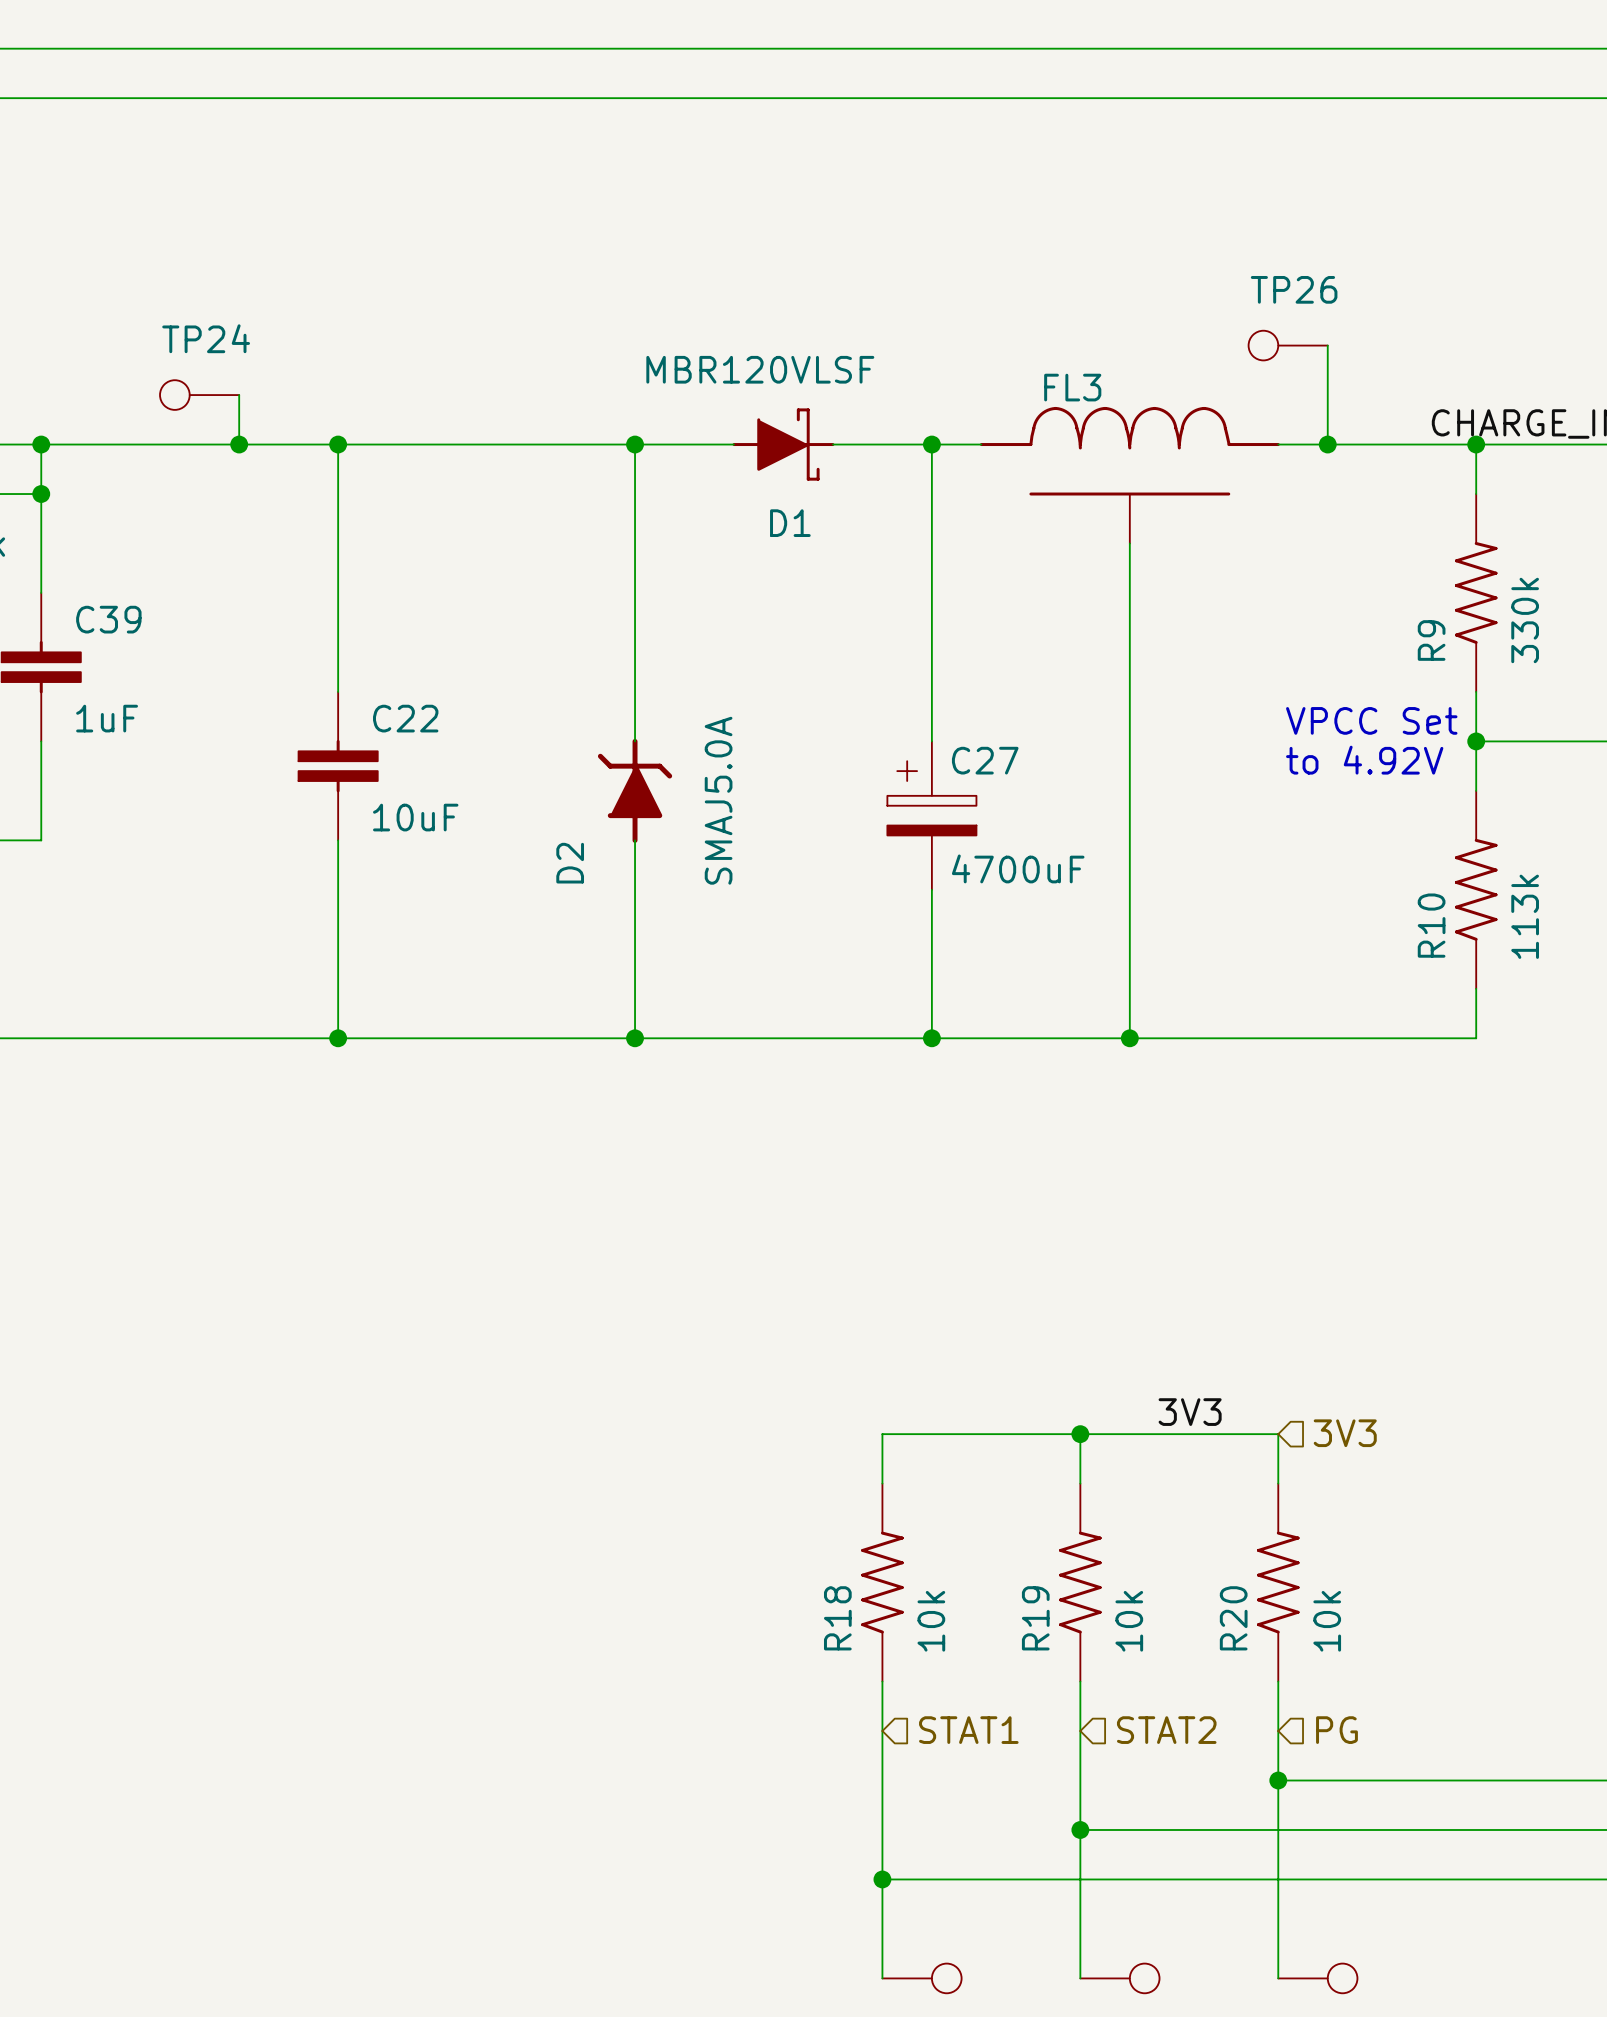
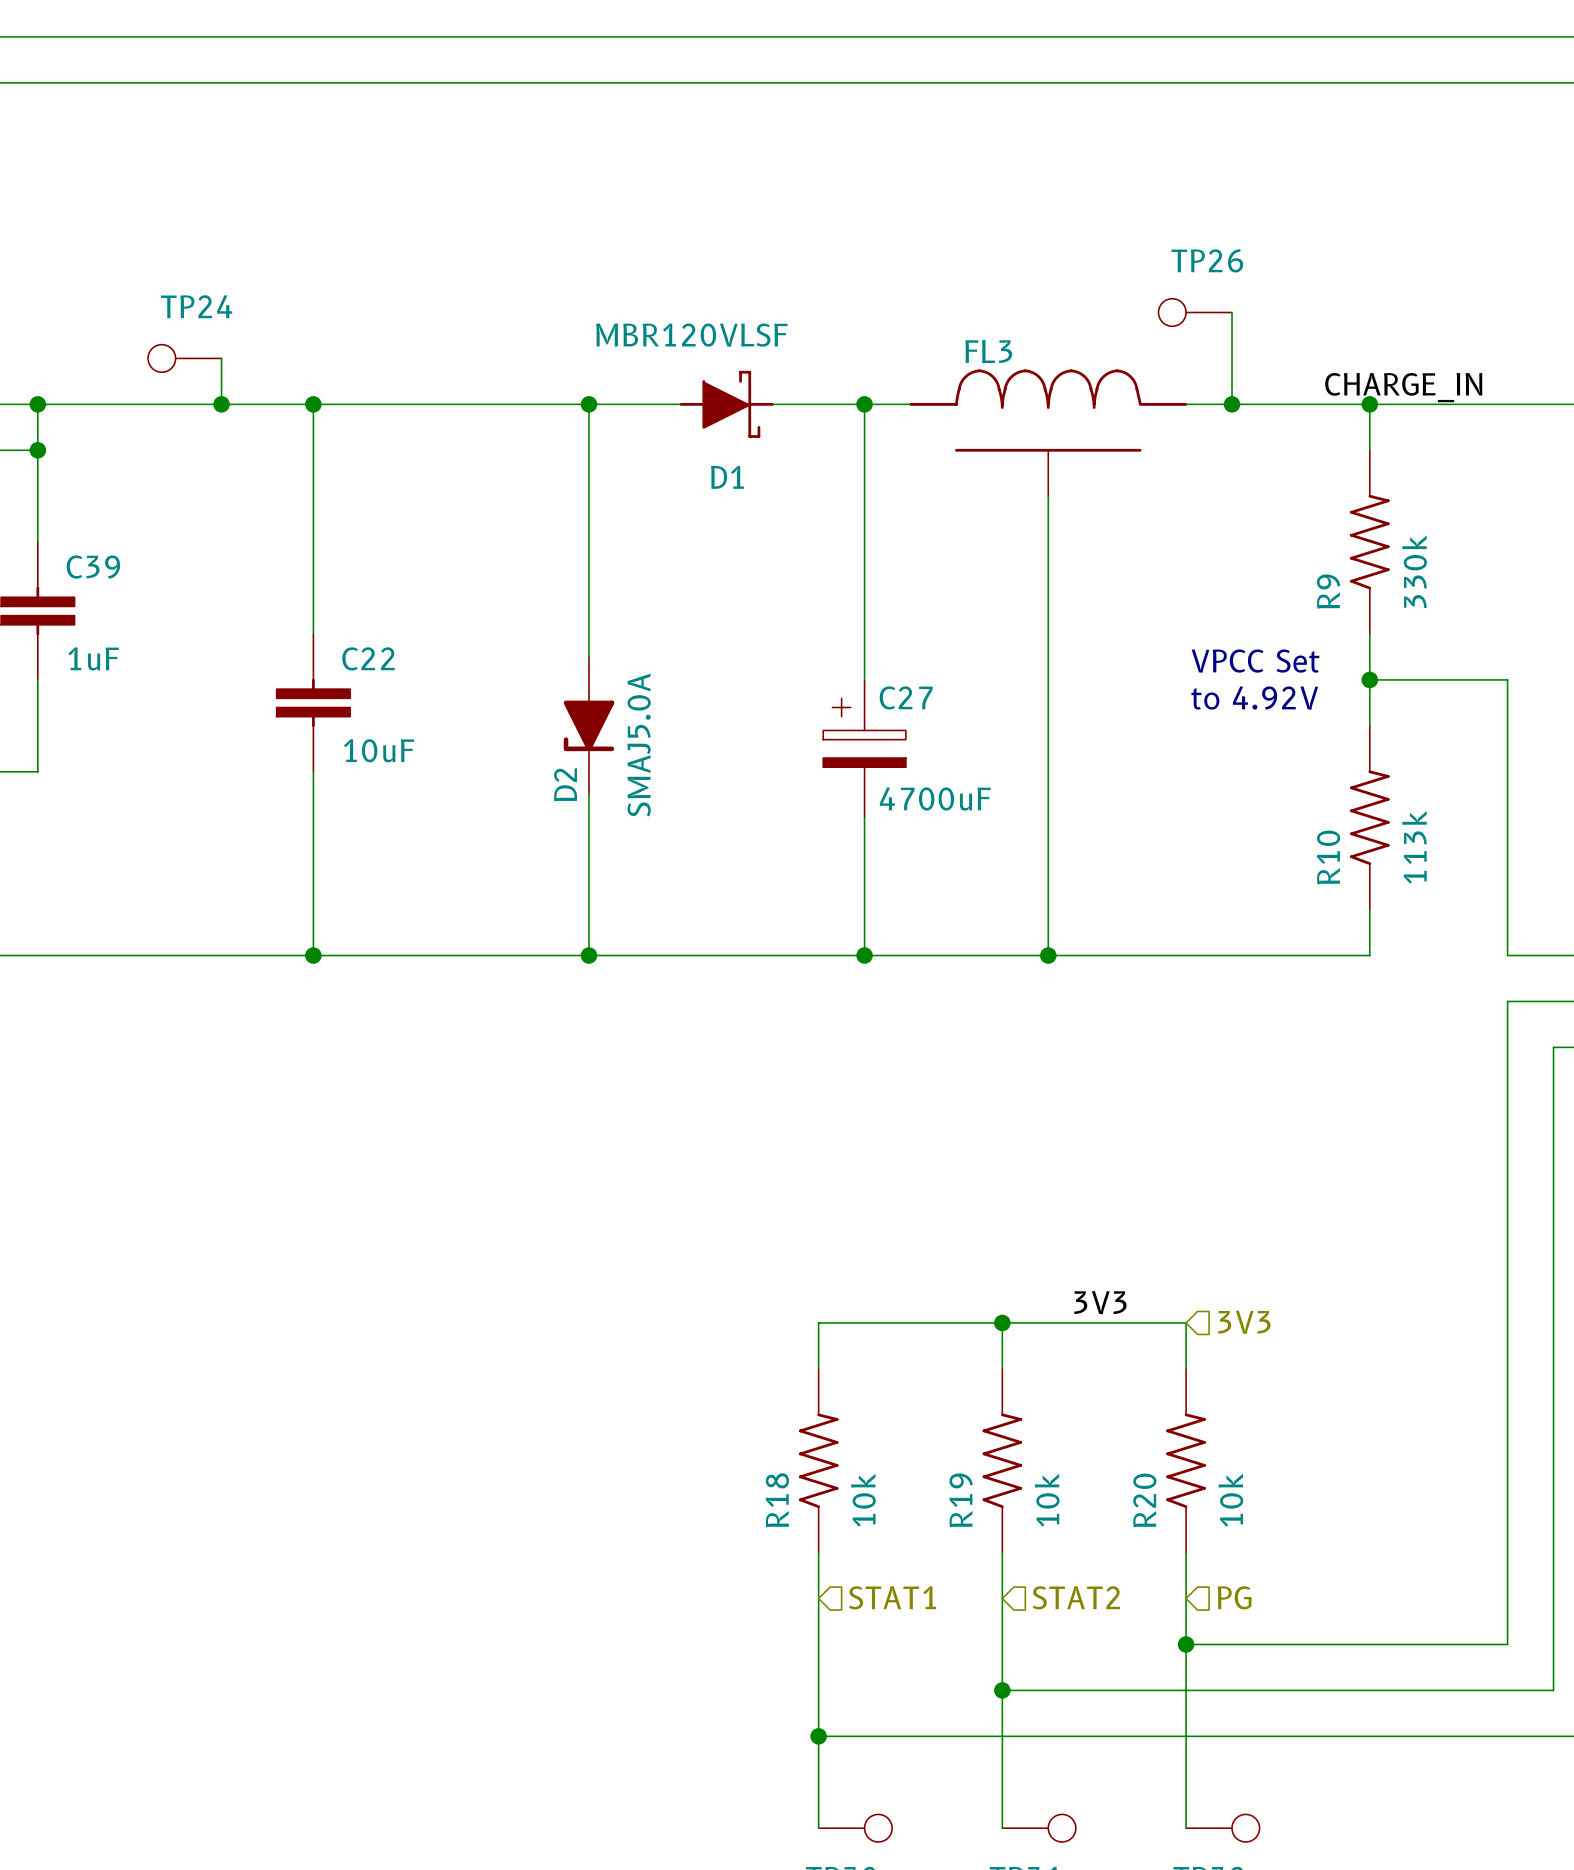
D2 symbol: [597, 738, 673, 843] -> [563, 656, 615, 795]
D2 name position: D2 (570, 863) -> D2 (565, 784)

